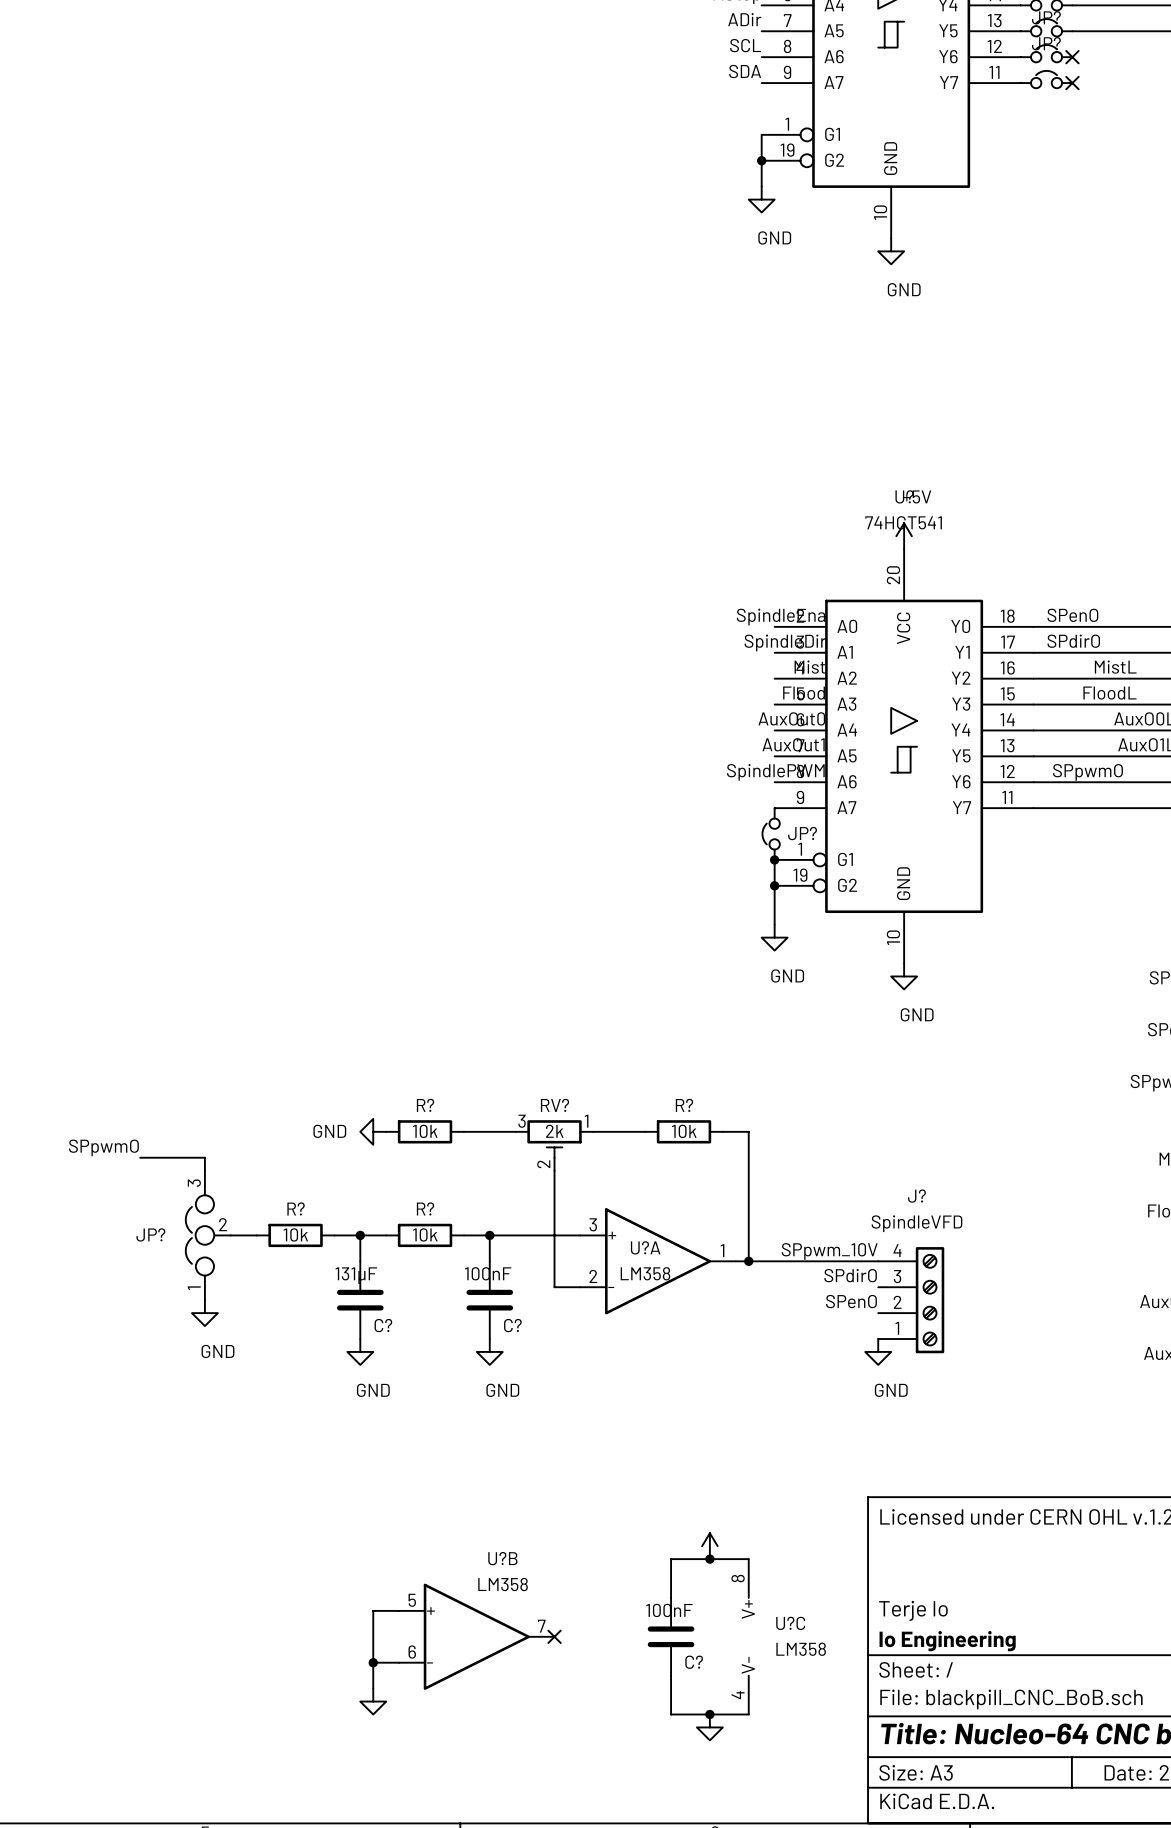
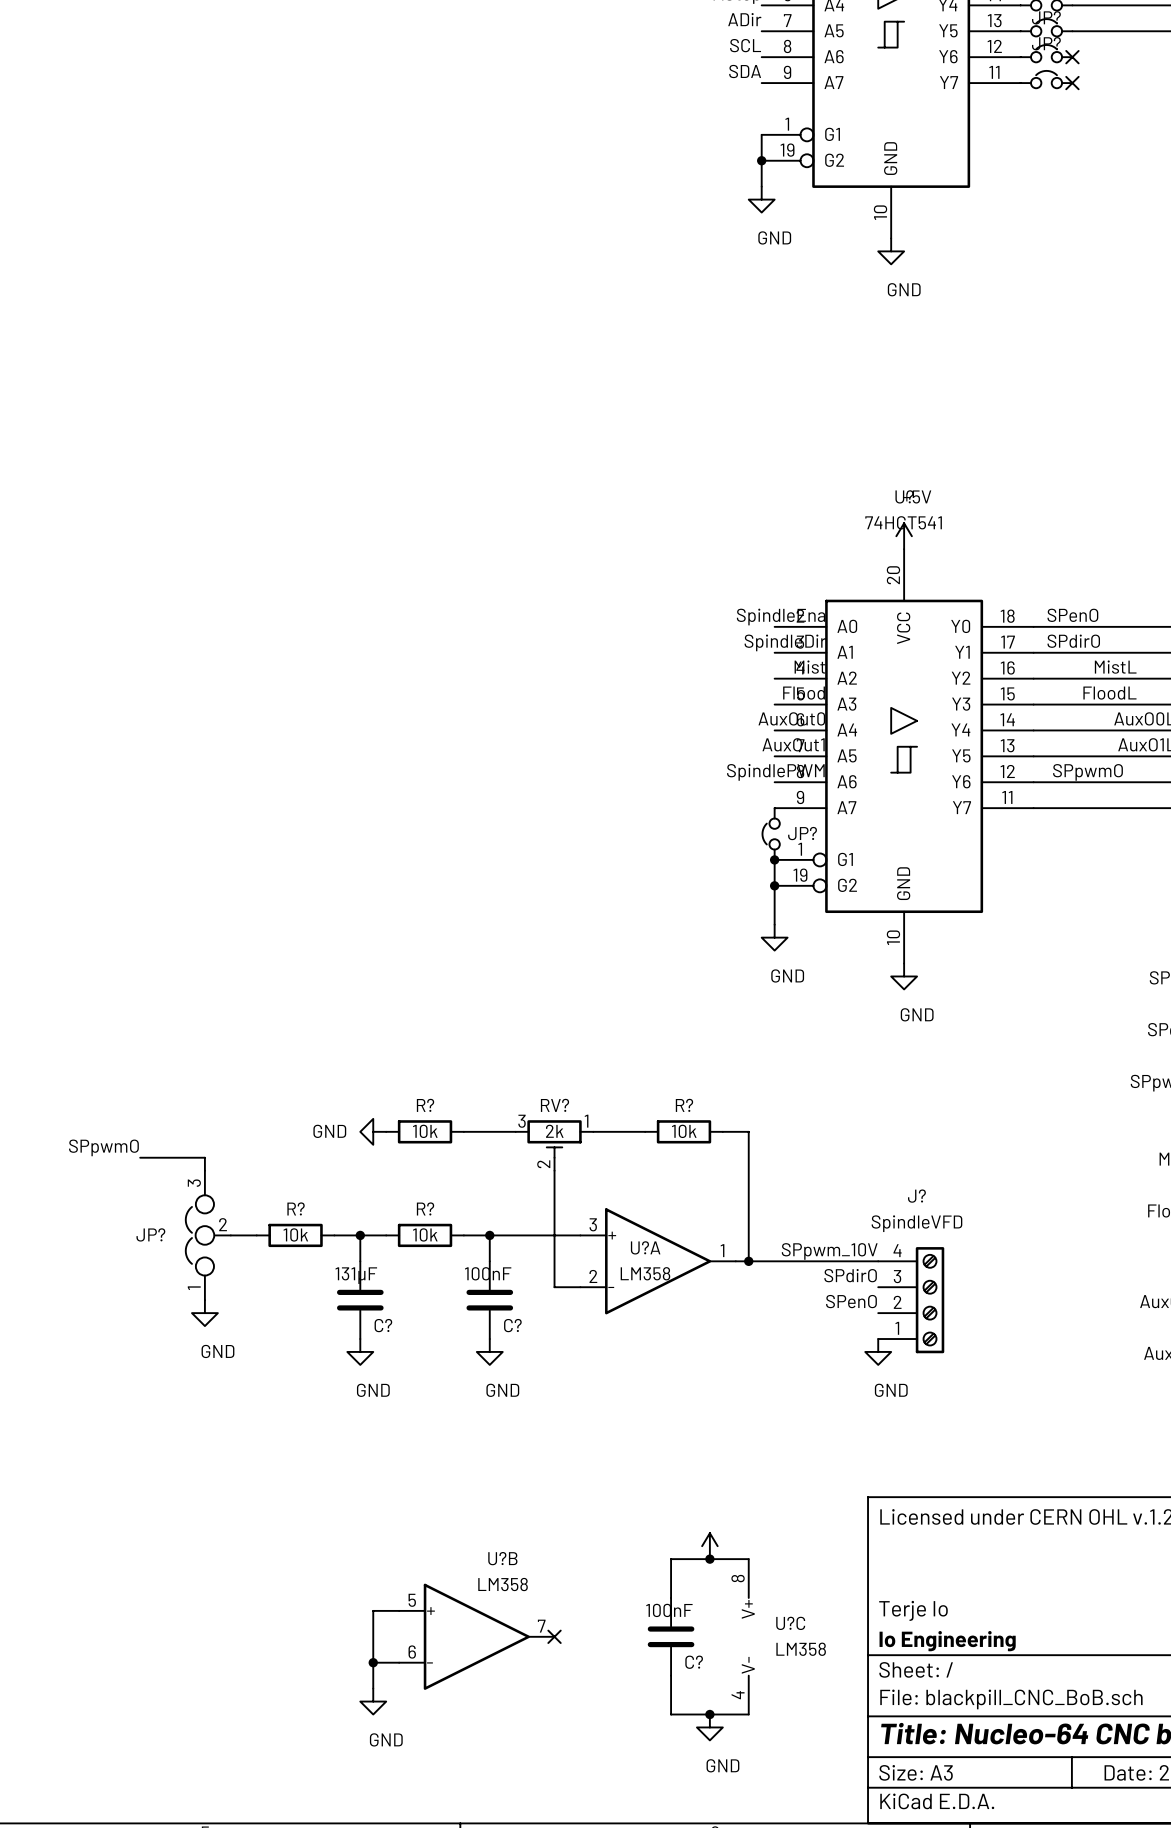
power symbol text: none -> GND (386, 1739)
power symbol text: none -> GND (722, 1765)

